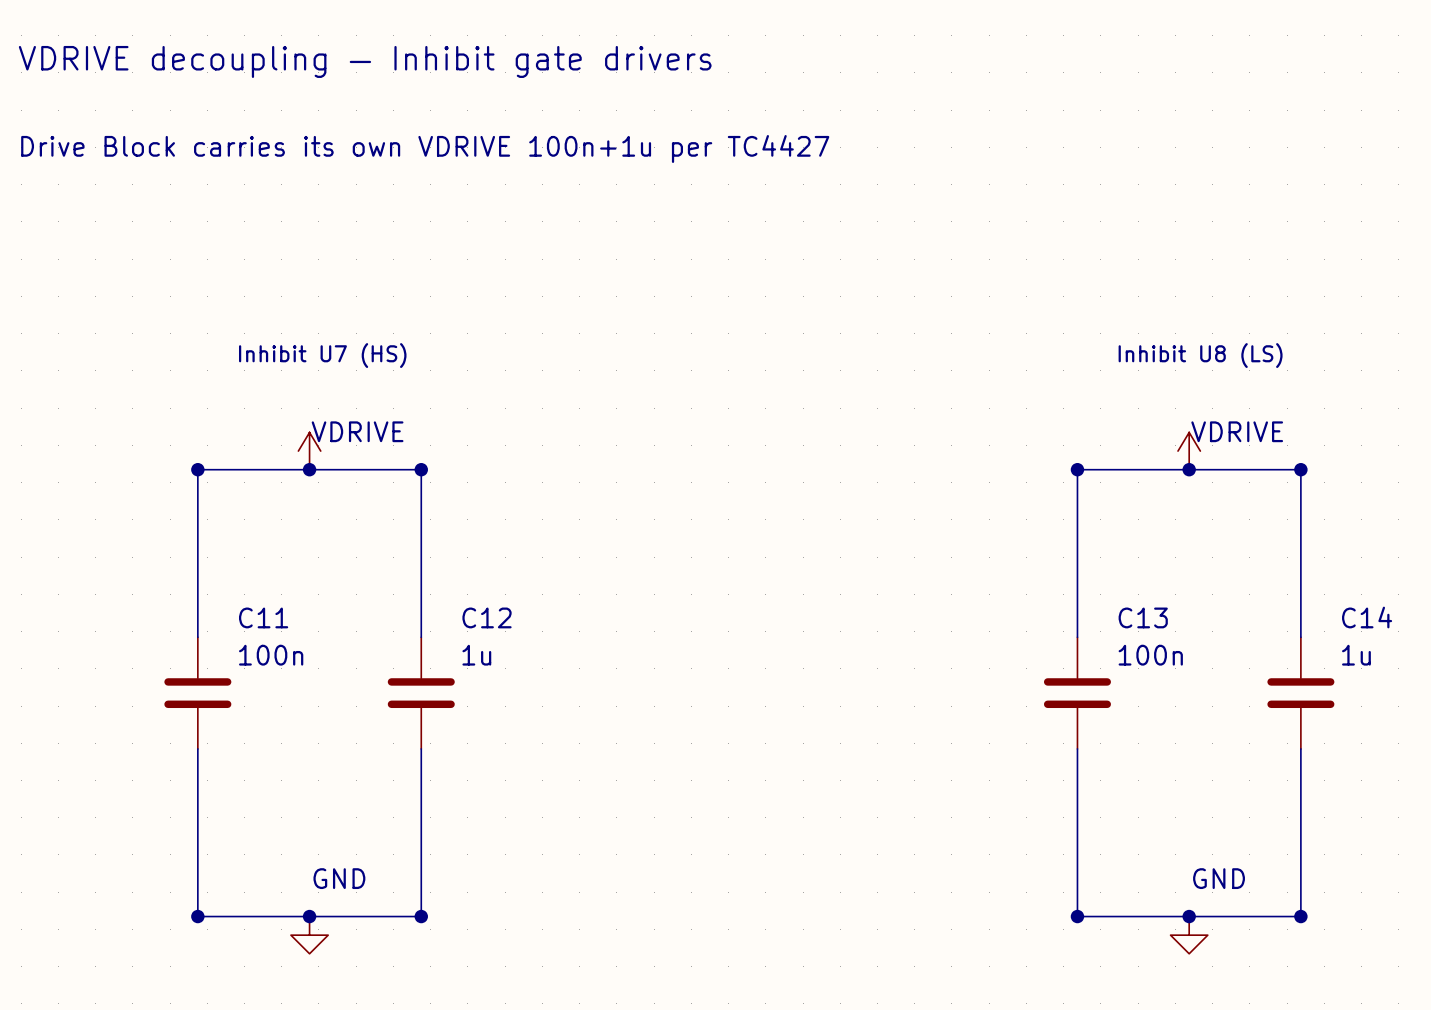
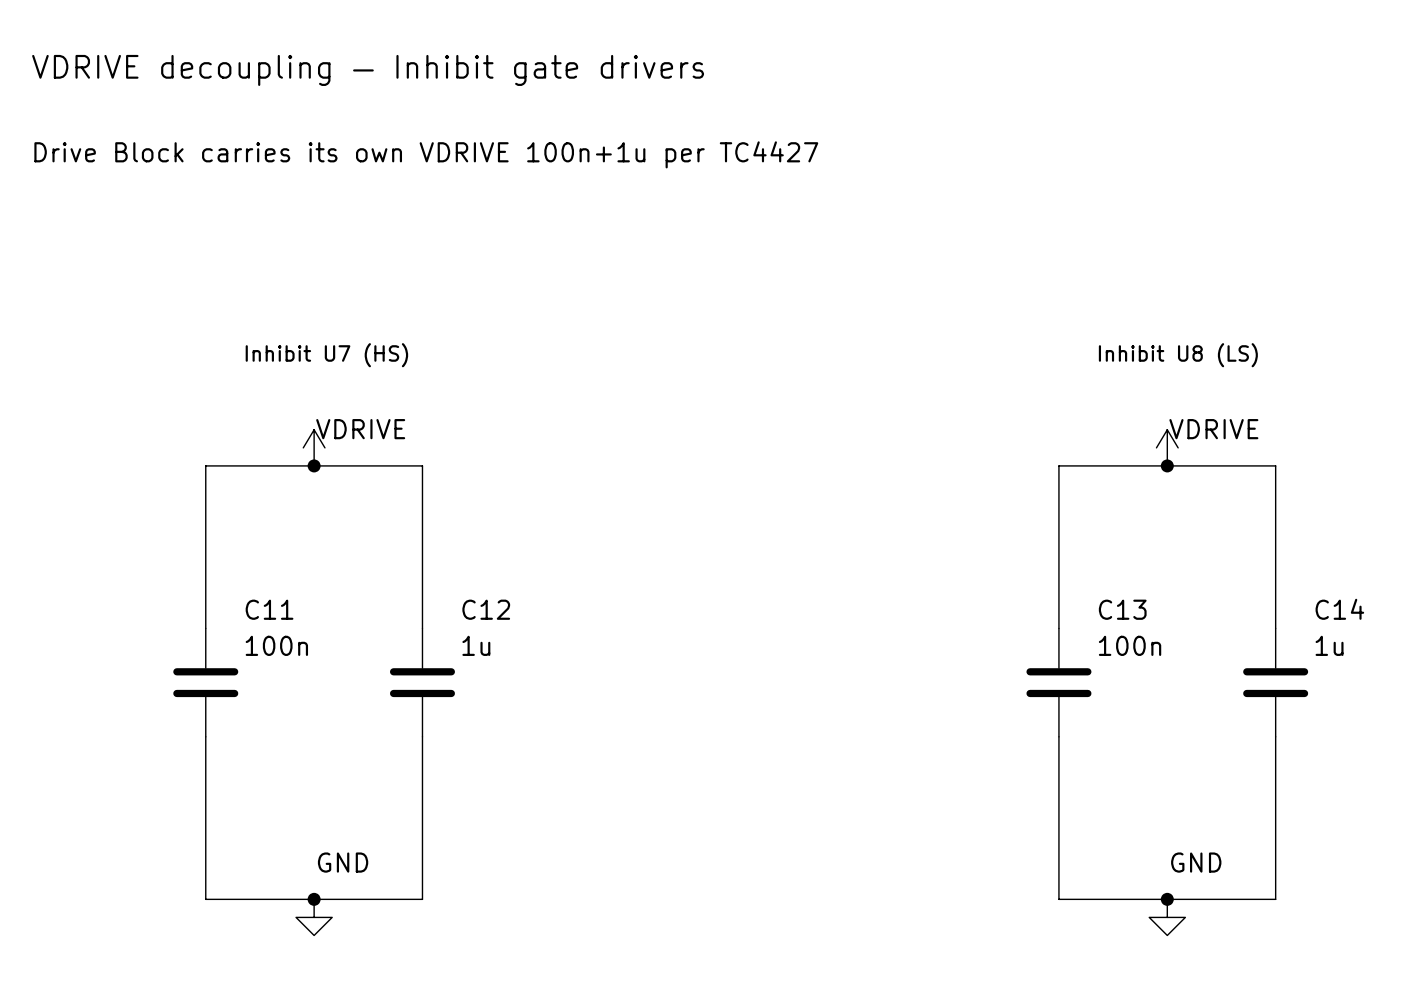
junction: (197, 469) -> none
junction: (421, 469) -> none
junction: (1077, 469) -> none
junction: (1300, 469) -> none
junction: (197, 916) -> none
junction: (421, 916) -> none
junction: (1077, 916) -> none
junction: (1300, 916) -> none

